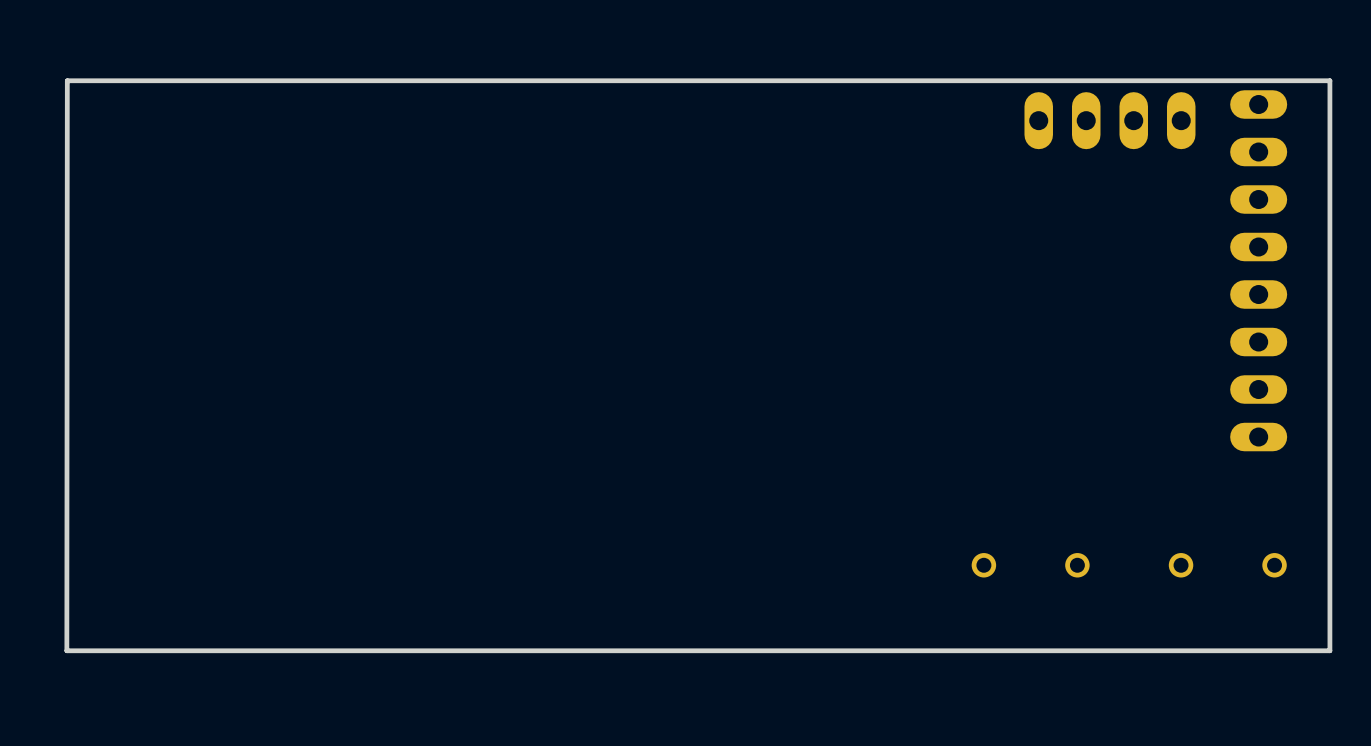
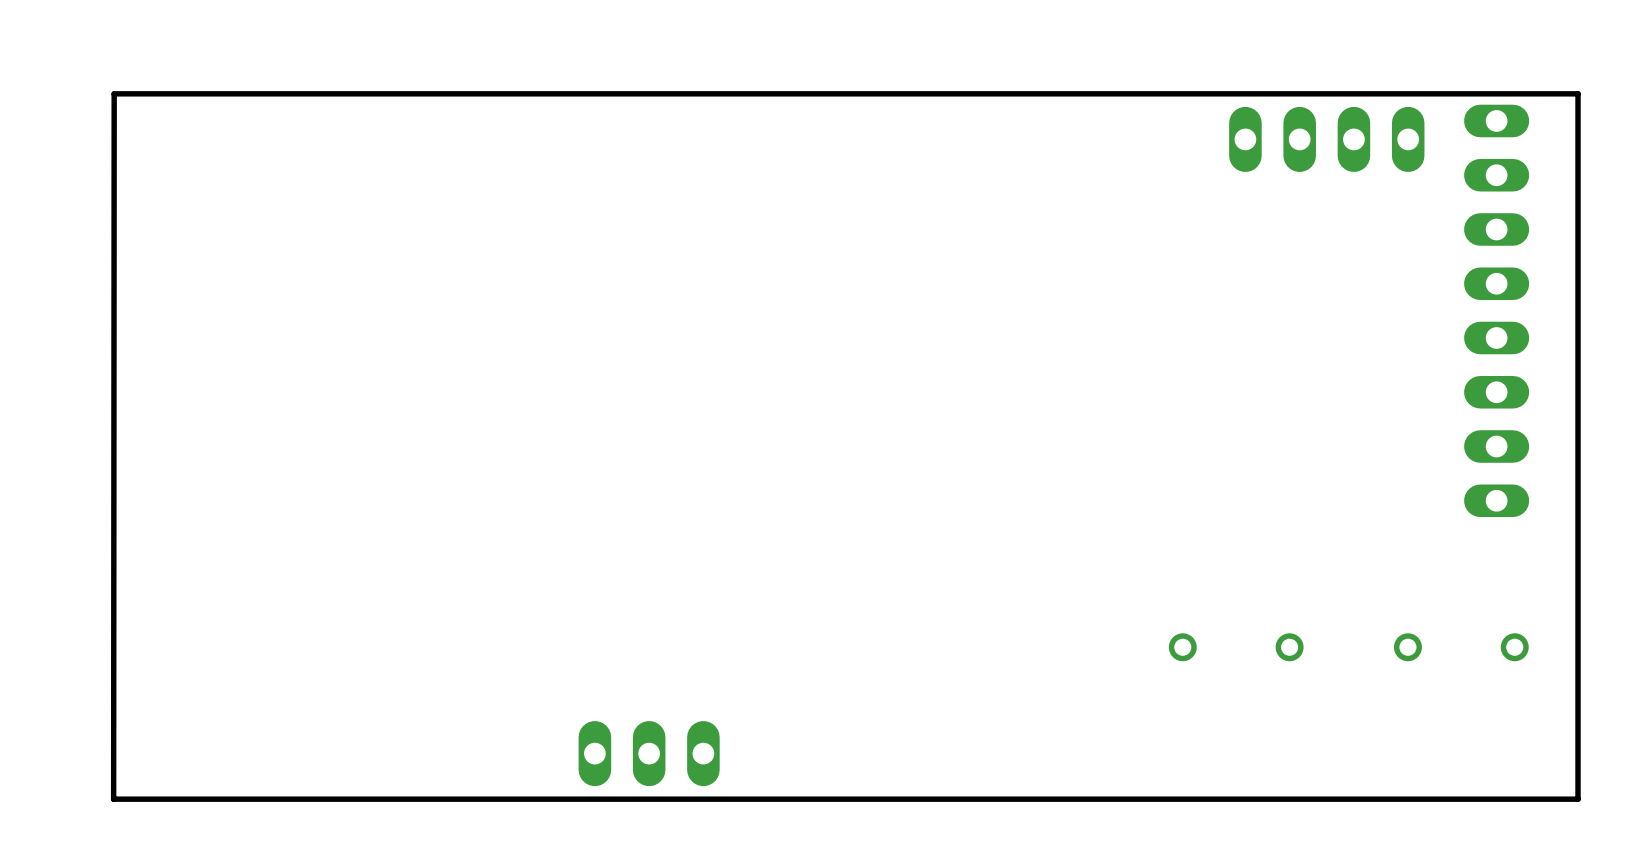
board edge: (67, 80) (66, 650) (1329, 650) -> (135, 93) (114, 93) (113, 799) (1578, 799) (1578, 744)
part: none -> (649, 753)

